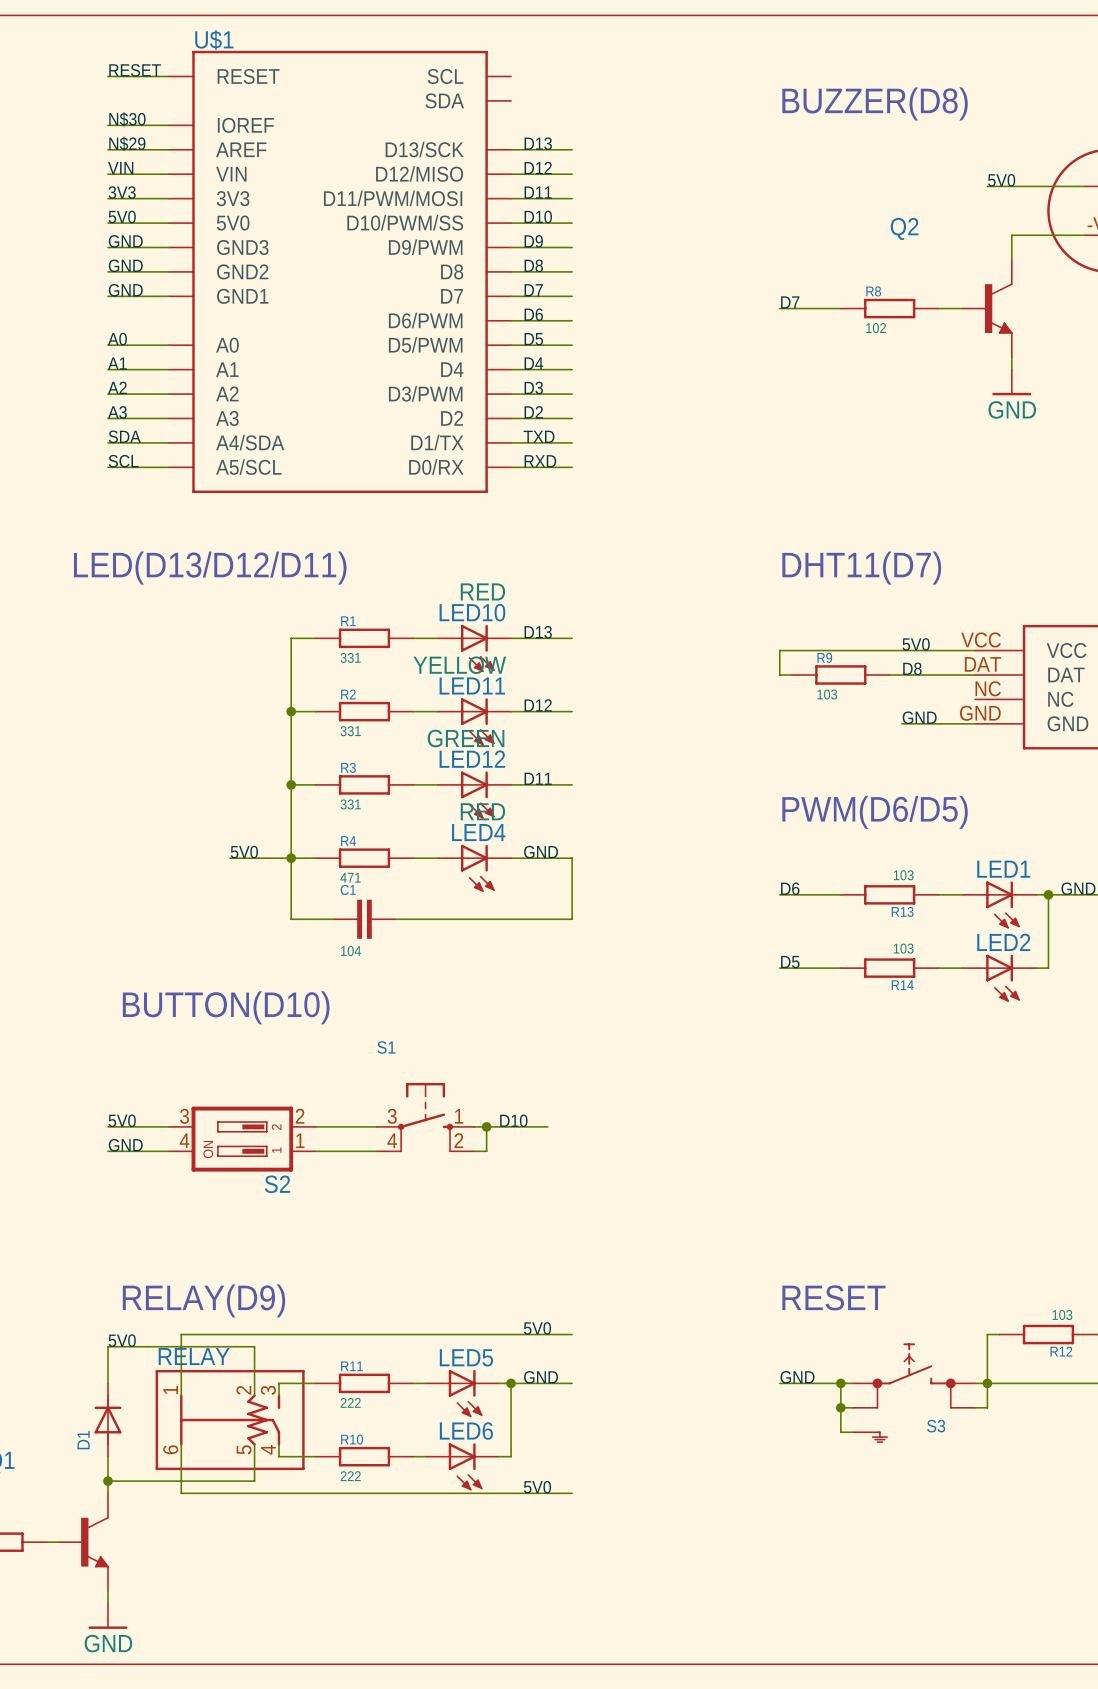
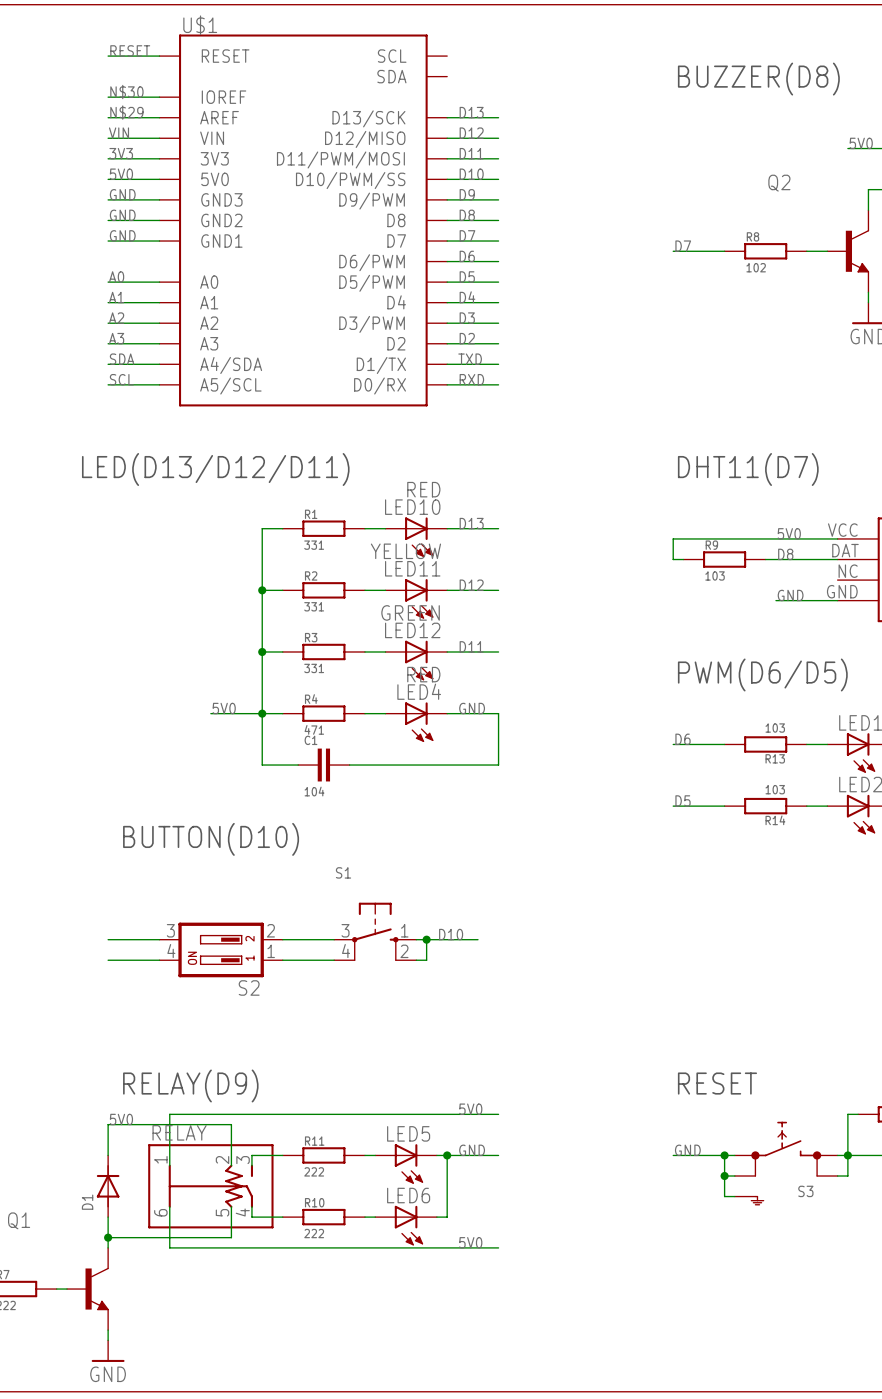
label: 5V0 (122, 1120) -> none
label: GND (125, 1145) -> none

